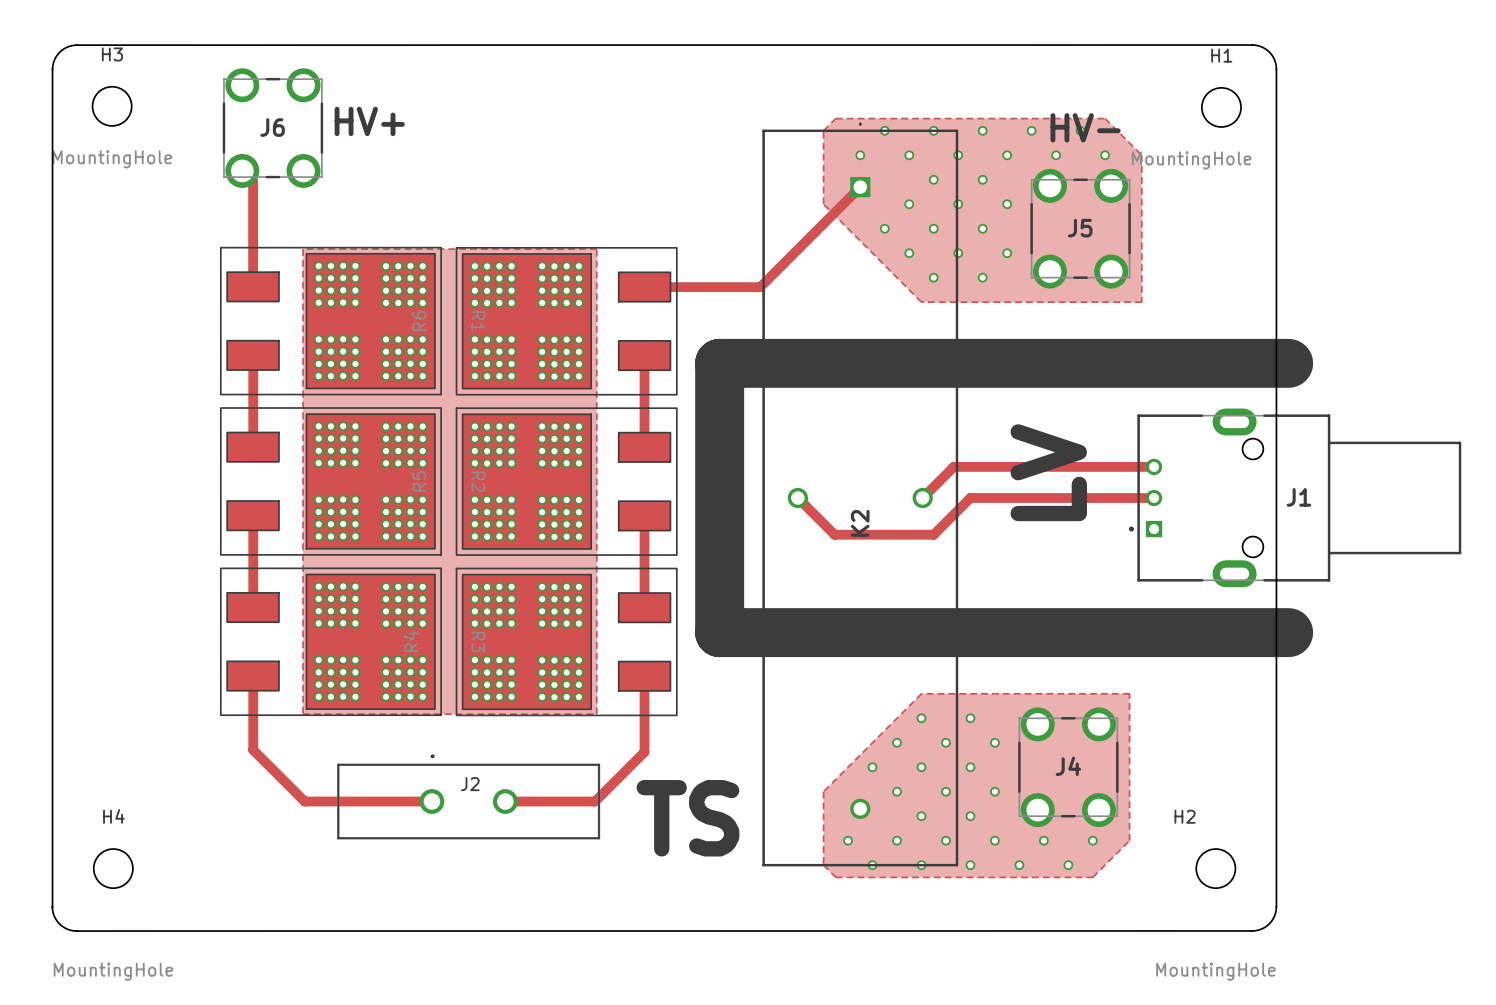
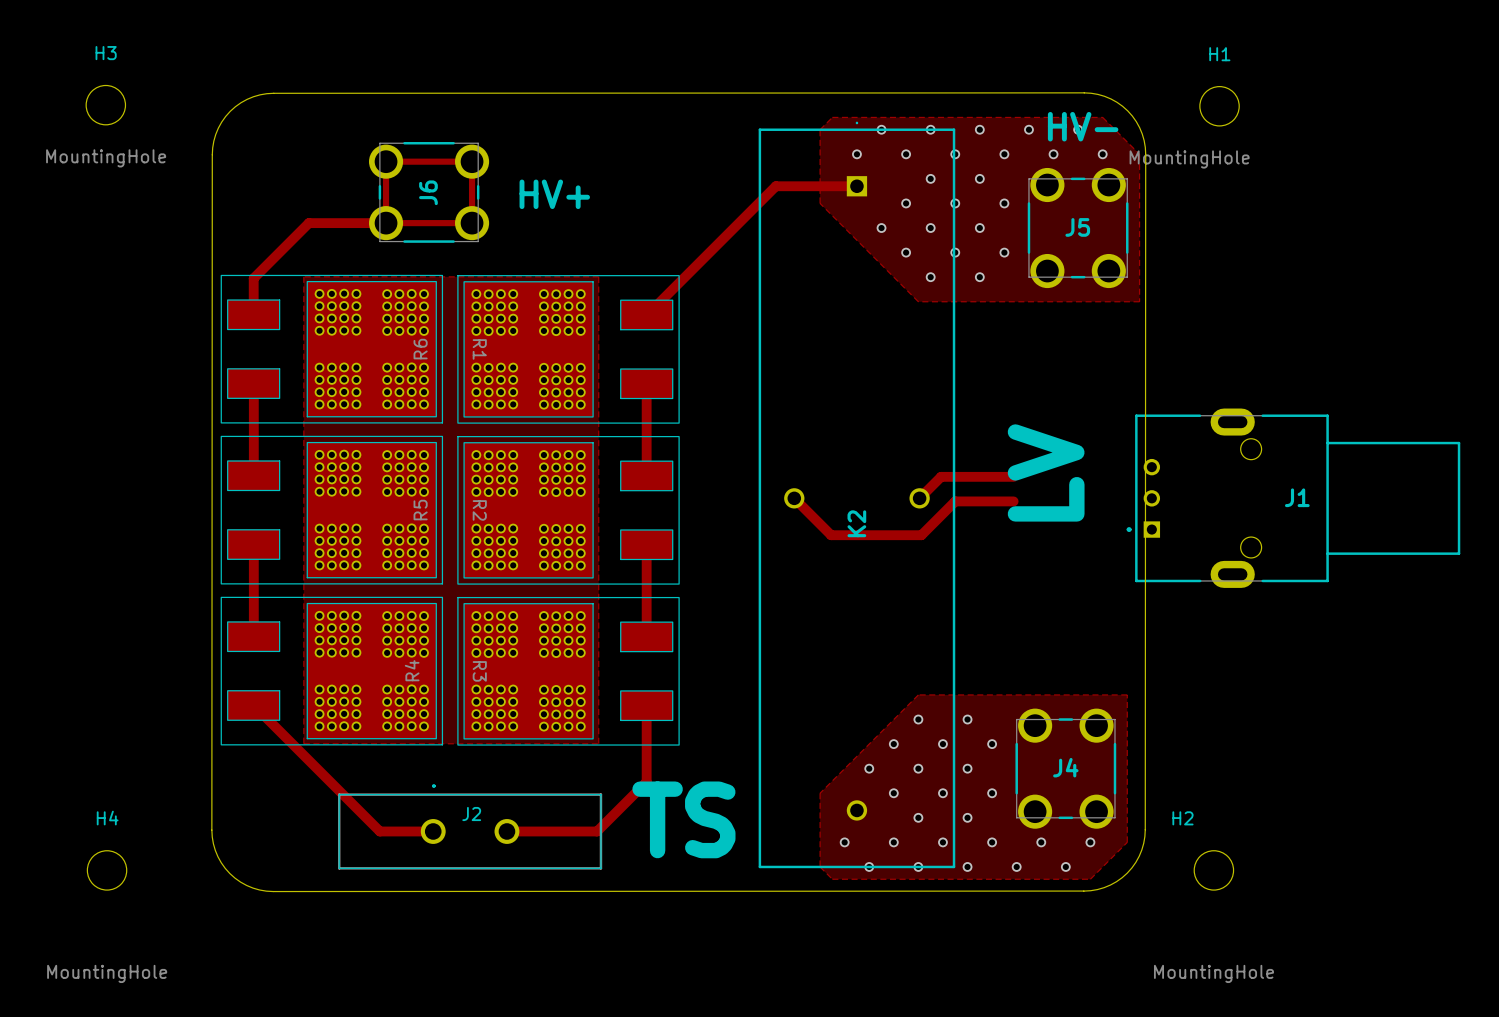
board edge: none -> (1084, 92) (273, 93) (253, 96) (241, 102) (230, 111) (218, 128) (213, 141) (212, 154) (211, 830) (213, 843) (217, 856) (229, 873) (246, 885) (259, 890) (273, 891) (1083, 891) (1104, 887) (1116, 881) (1127, 873) (1135, 862) (1141, 849) (1145, 829) (1145, 154) (1144, 140) (1139, 127) (1127, 110) (1110, 98) (1097, 94) (1084, 92)
text position: HV+ (369, 121) -> HV+ (554, 194)
J6 rotation: 0° (272, 128) -> 90° clockwise (429, 192)
J6 position: (272, 128) -> (429, 192)
track: (242, 170) (253, 181) (253, 286) -> none
track: (860, 187) (760, 287) (644, 287) -> (856, 186) (775, 186) (646, 315)
track: none -> (386, 223) (308, 223) (253, 278) (253, 314)
track: none -> (386, 223) (472, 223) (472, 161) (386, 161) (386, 223)
zone outline: (303, 249) (596, 249) (596, 714) (303, 714) (303, 249) -> (303, 276) (598, 276) (598, 743) (303, 743) (303, 276)
R1 position: (330, 321) -> (331, 349)
R6 position: (566, 321) -> (568, 349)
track: (253, 355) (253, 446) -> (253, 383) (253, 475)
track: (644, 355) (644, 447) -> (646, 383) (646, 475)
line: (1288, 363) (719, 363) (719, 632) (1288, 632) -> none
track: (1154, 466) (953, 466) (944, 476) -> (1013, 476) (941, 476)
R2 position: (330, 481) -> (331, 510)
R5 position: (566, 481) -> (568, 510)
track: (1154, 497) (970, 497) (933, 534) (924, 534) -> (1013, 501) (955, 501) (921, 535)
track: (253, 515) (253, 607) -> (253, 544) (253, 636)
track: (644, 516) (644, 607) -> (646, 544) (646, 636)
R3 position: (330, 641) -> (331, 671)
R4 position: (566, 641) -> (568, 671)
track: (253, 675) (253, 750) (304, 801) (431, 801) -> none
track: (644, 676) (644, 752) (595, 801) (505, 801) -> (646, 705) (646, 781) (597, 831) (506, 831)
track: none -> (253, 705) (379, 831) (433, 831)
text position: J2 (470, 784) -> J2 (471, 814)
part position: (468, 796) -> (470, 826)
board edge: (52, 906) (52, 912) (54, 917) (59, 923) (66, 928) (76, 931) (1252, 930) (1267, 925) (1274, 915) (1276, 906) (1276, 69) (1271, 54) (1263, 47) (1252, 45) (77, 45) (63, 48) (54, 59) (52, 69) (52, 907) -> none

